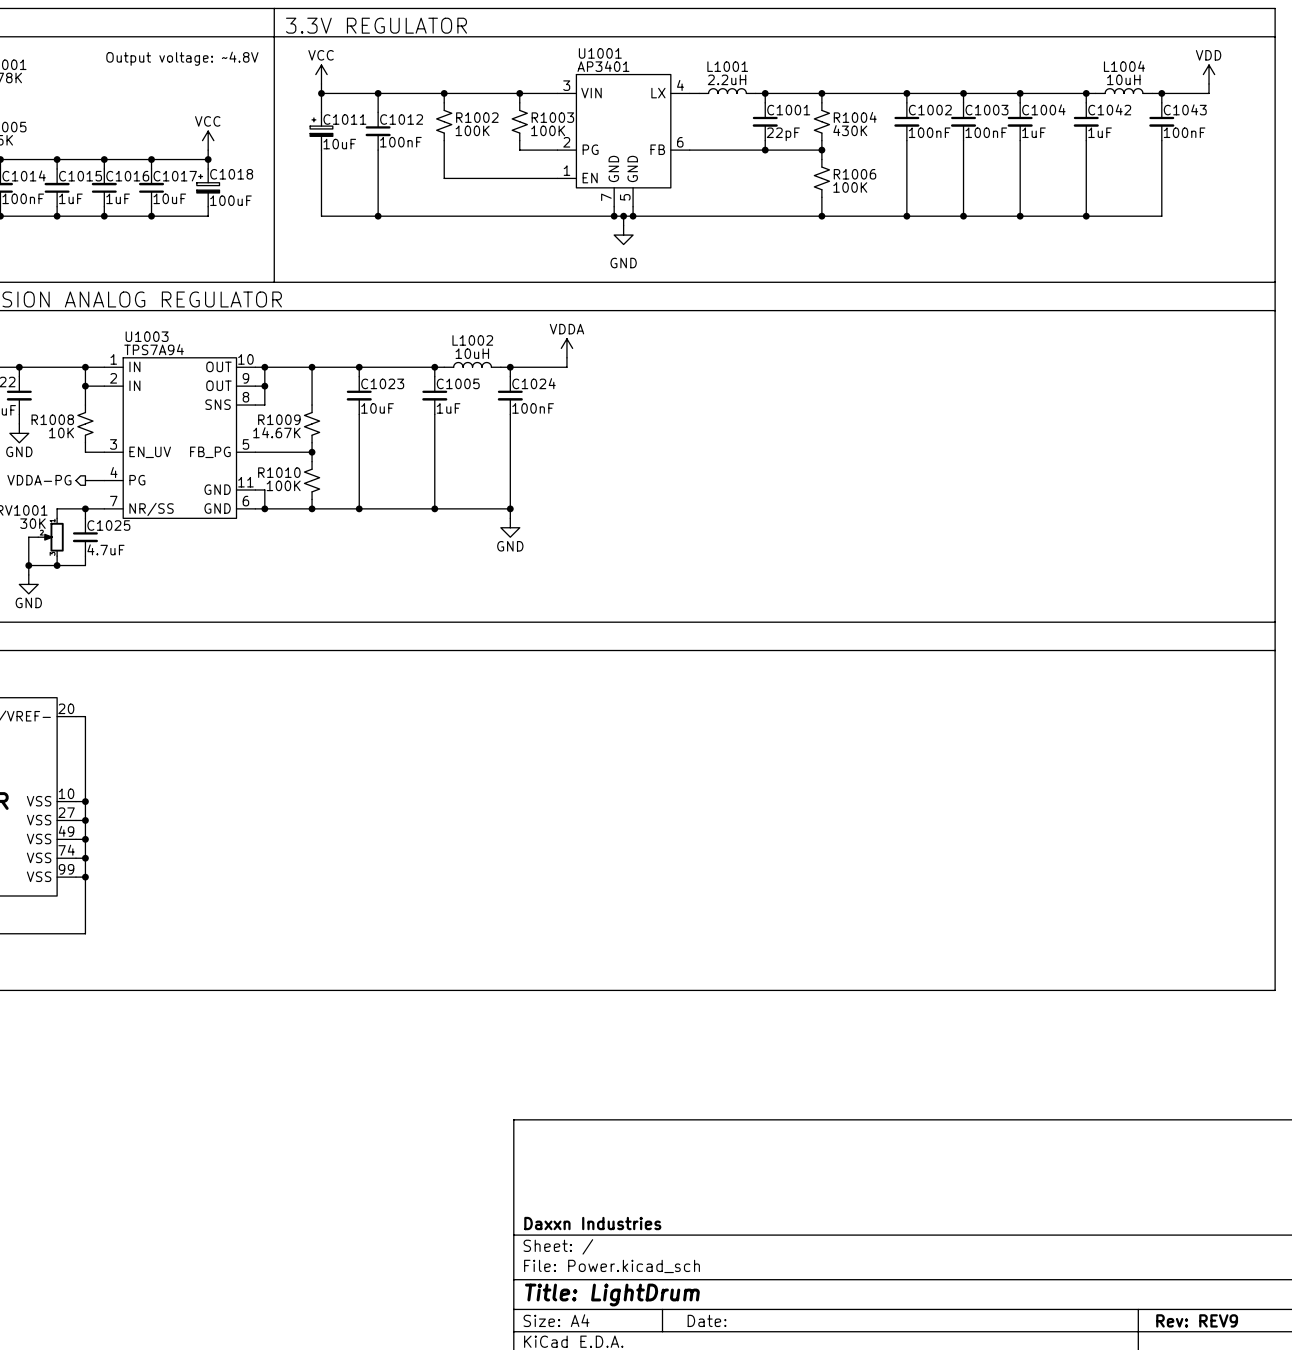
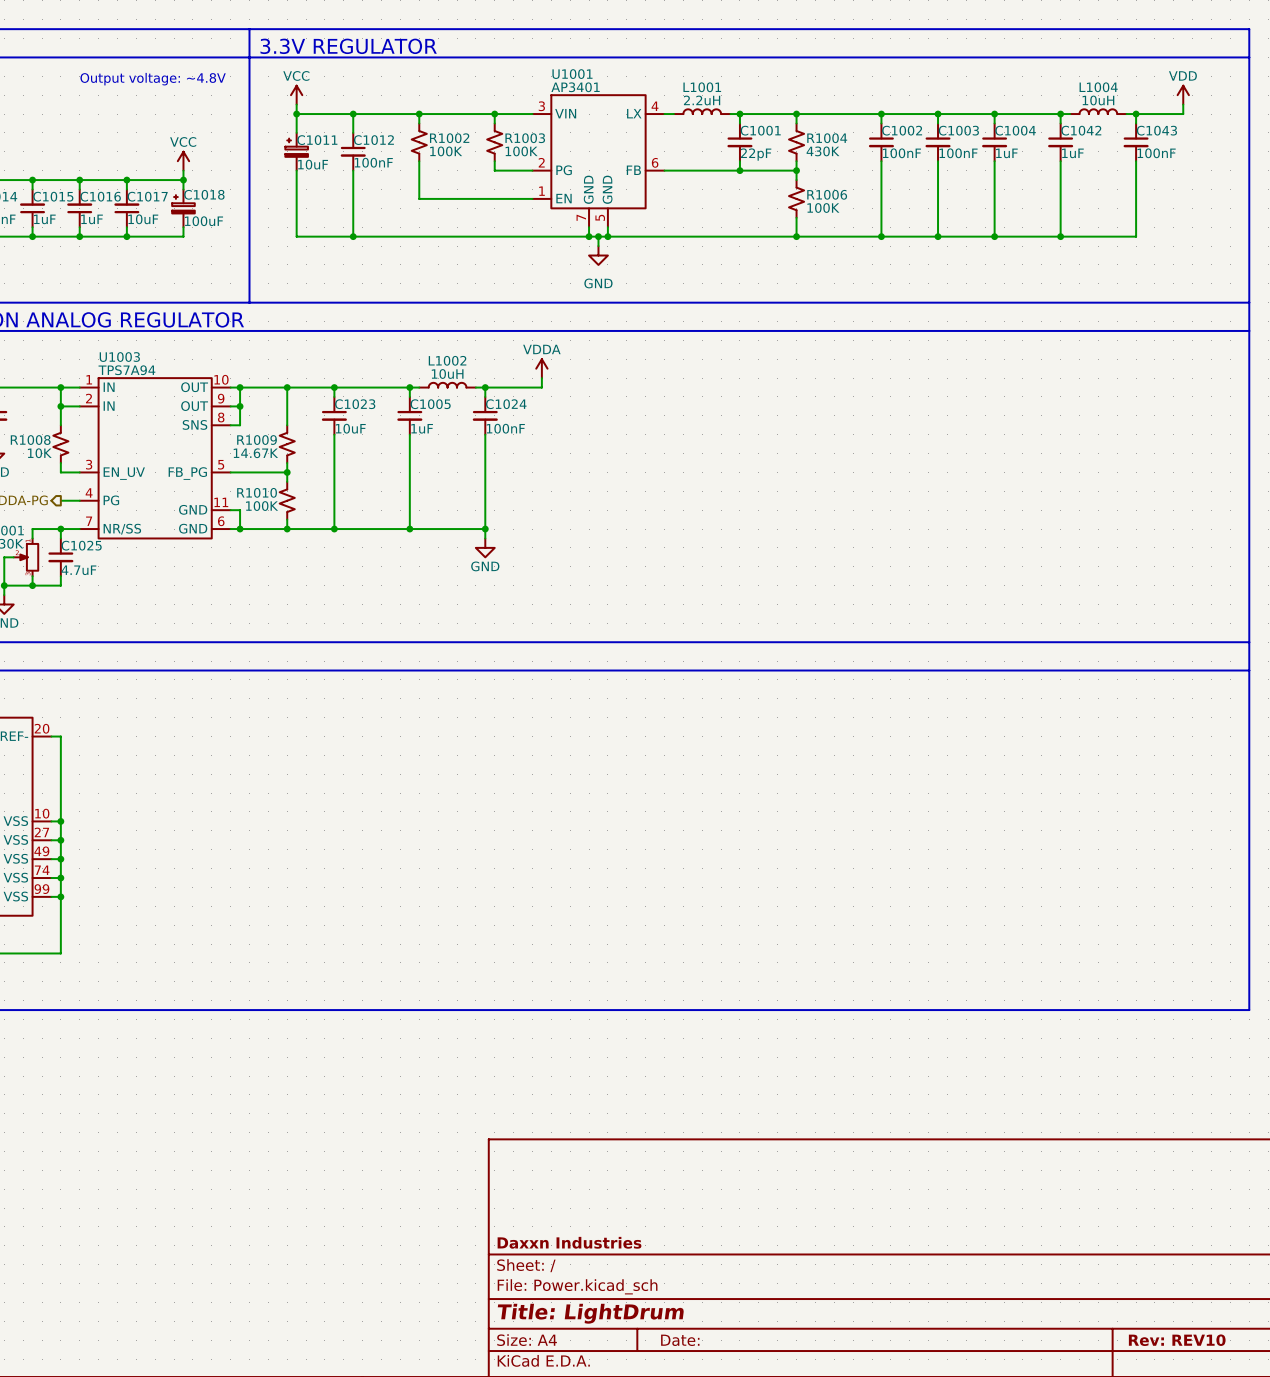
title block: Rev: REV9 (1197, 1320) -> Rev: REV10 (1177, 1340)

